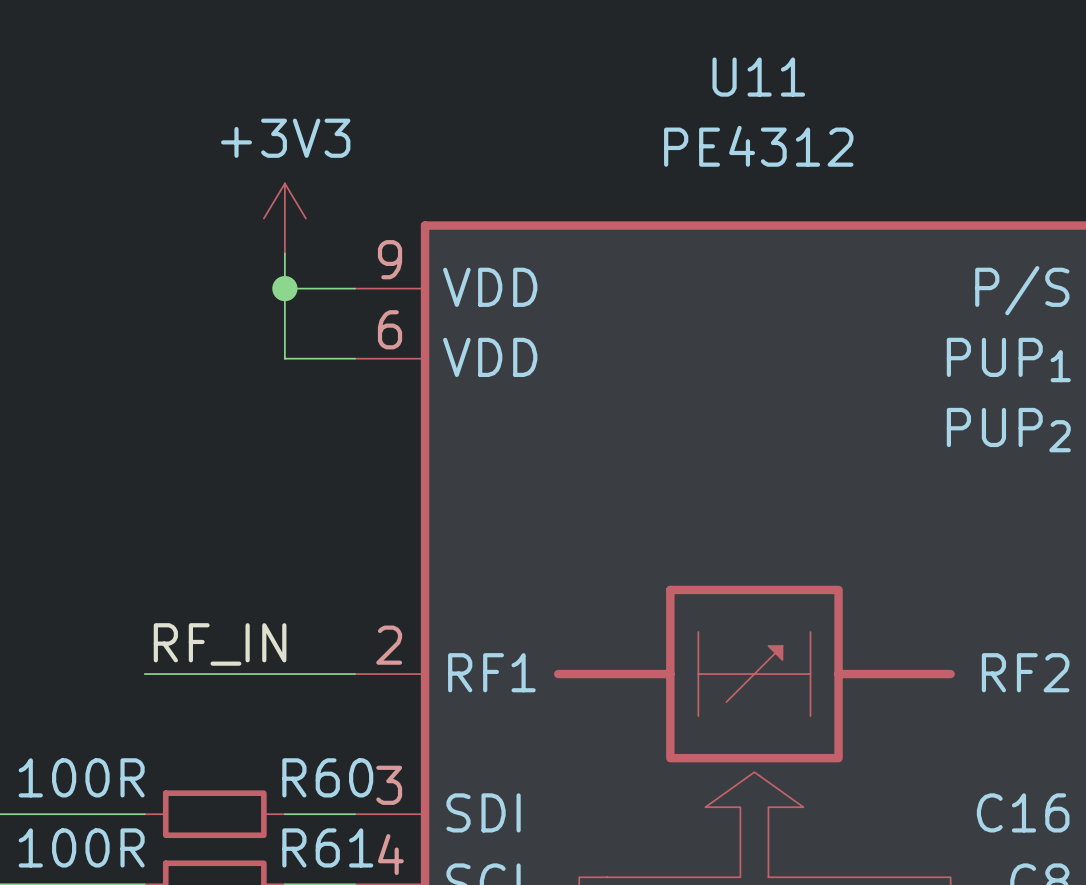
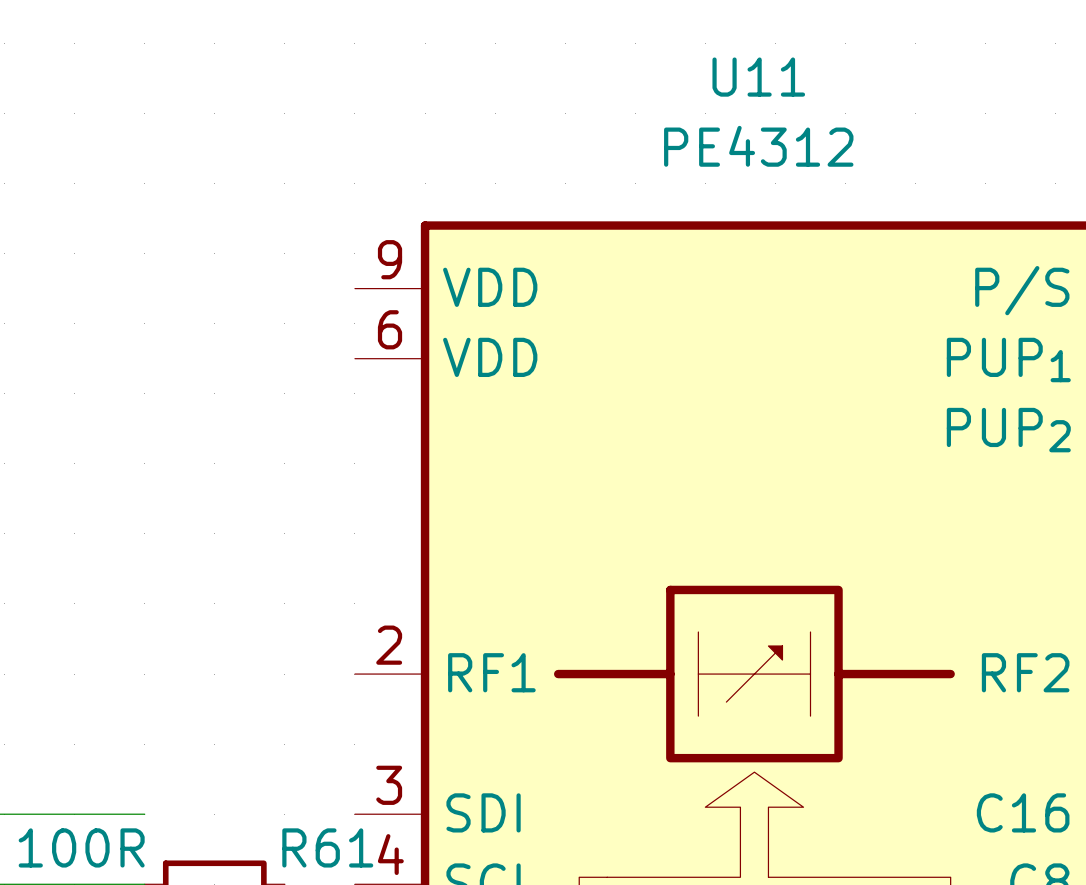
power symbol: +3V3 (284, 218) -> none
wire: (284, 253) (284, 358) (354, 358) -> none
wire: (284, 288) (354, 288) -> none
junction: (284, 288) -> none
label: RF_IN (220, 644) -> none
wire: (144, 674) (354, 674) -> none
R60: 100R (214, 814) -> none
wire: (284, 814) (354, 814) -> none
wire: (284, 884) (354, 884) -> none

